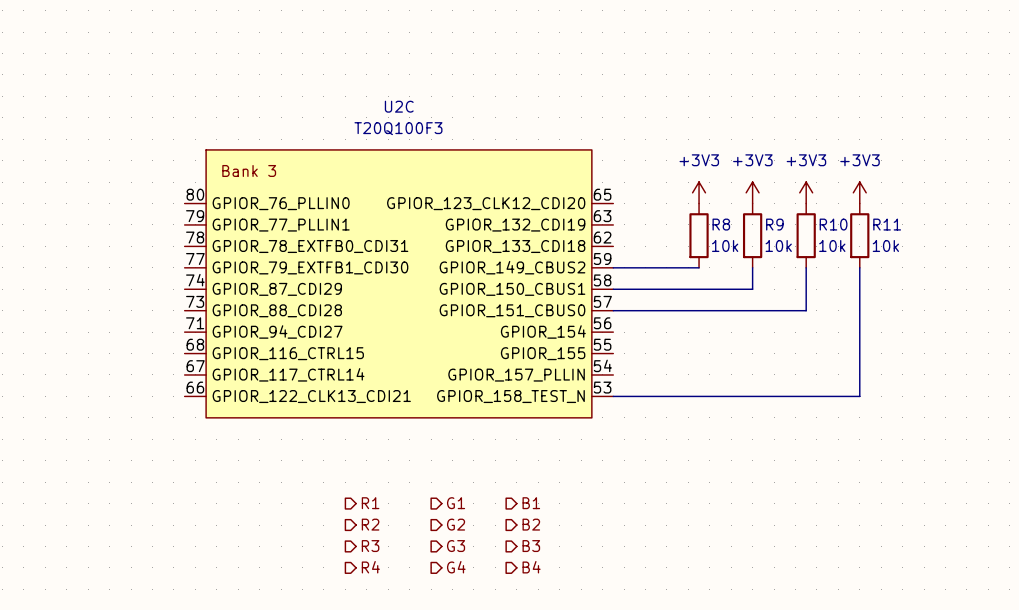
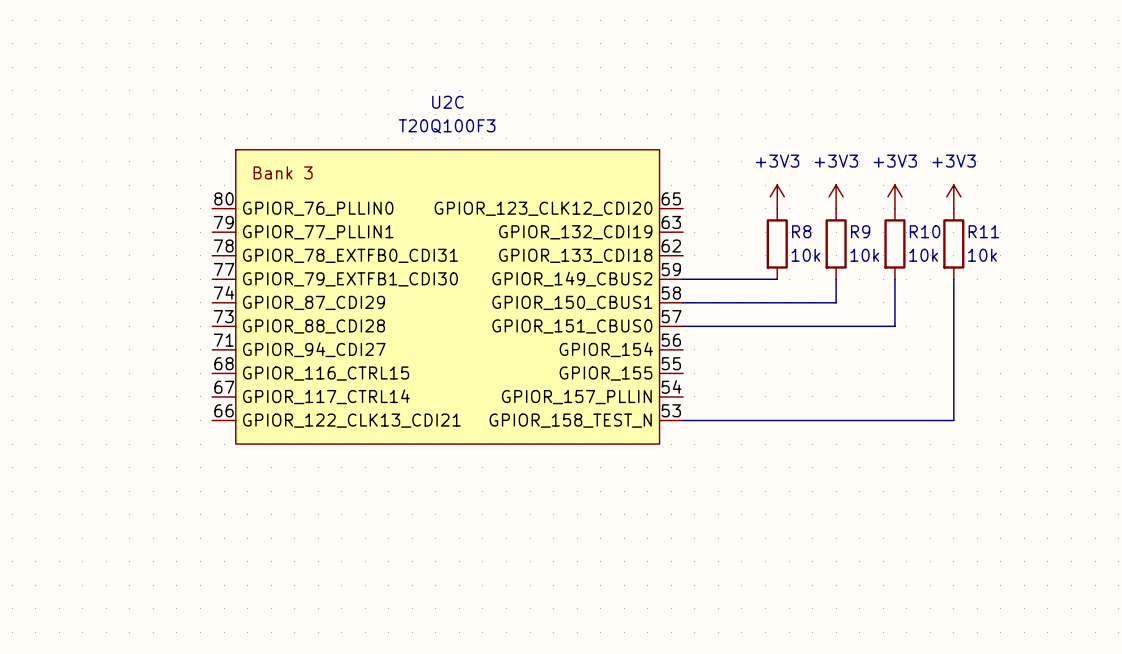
hierarchical label: R1 (370, 503) -> none
hierarchical label: G1 (456, 503) -> none
hierarchical label: B1 (531, 503) -> none
hierarchical label: R2 (370, 524) -> none
hierarchical label: G2 (456, 524) -> none
hierarchical label: B2 (531, 524) -> none
hierarchical label: R3 (370, 546) -> none
hierarchical label: G3 (456, 546) -> none
hierarchical label: B3 (531, 546) -> none
hierarchical label: R4 (370, 567) -> none
hierarchical label: G4 (456, 567) -> none
hierarchical label: B4 (531, 567) -> none

